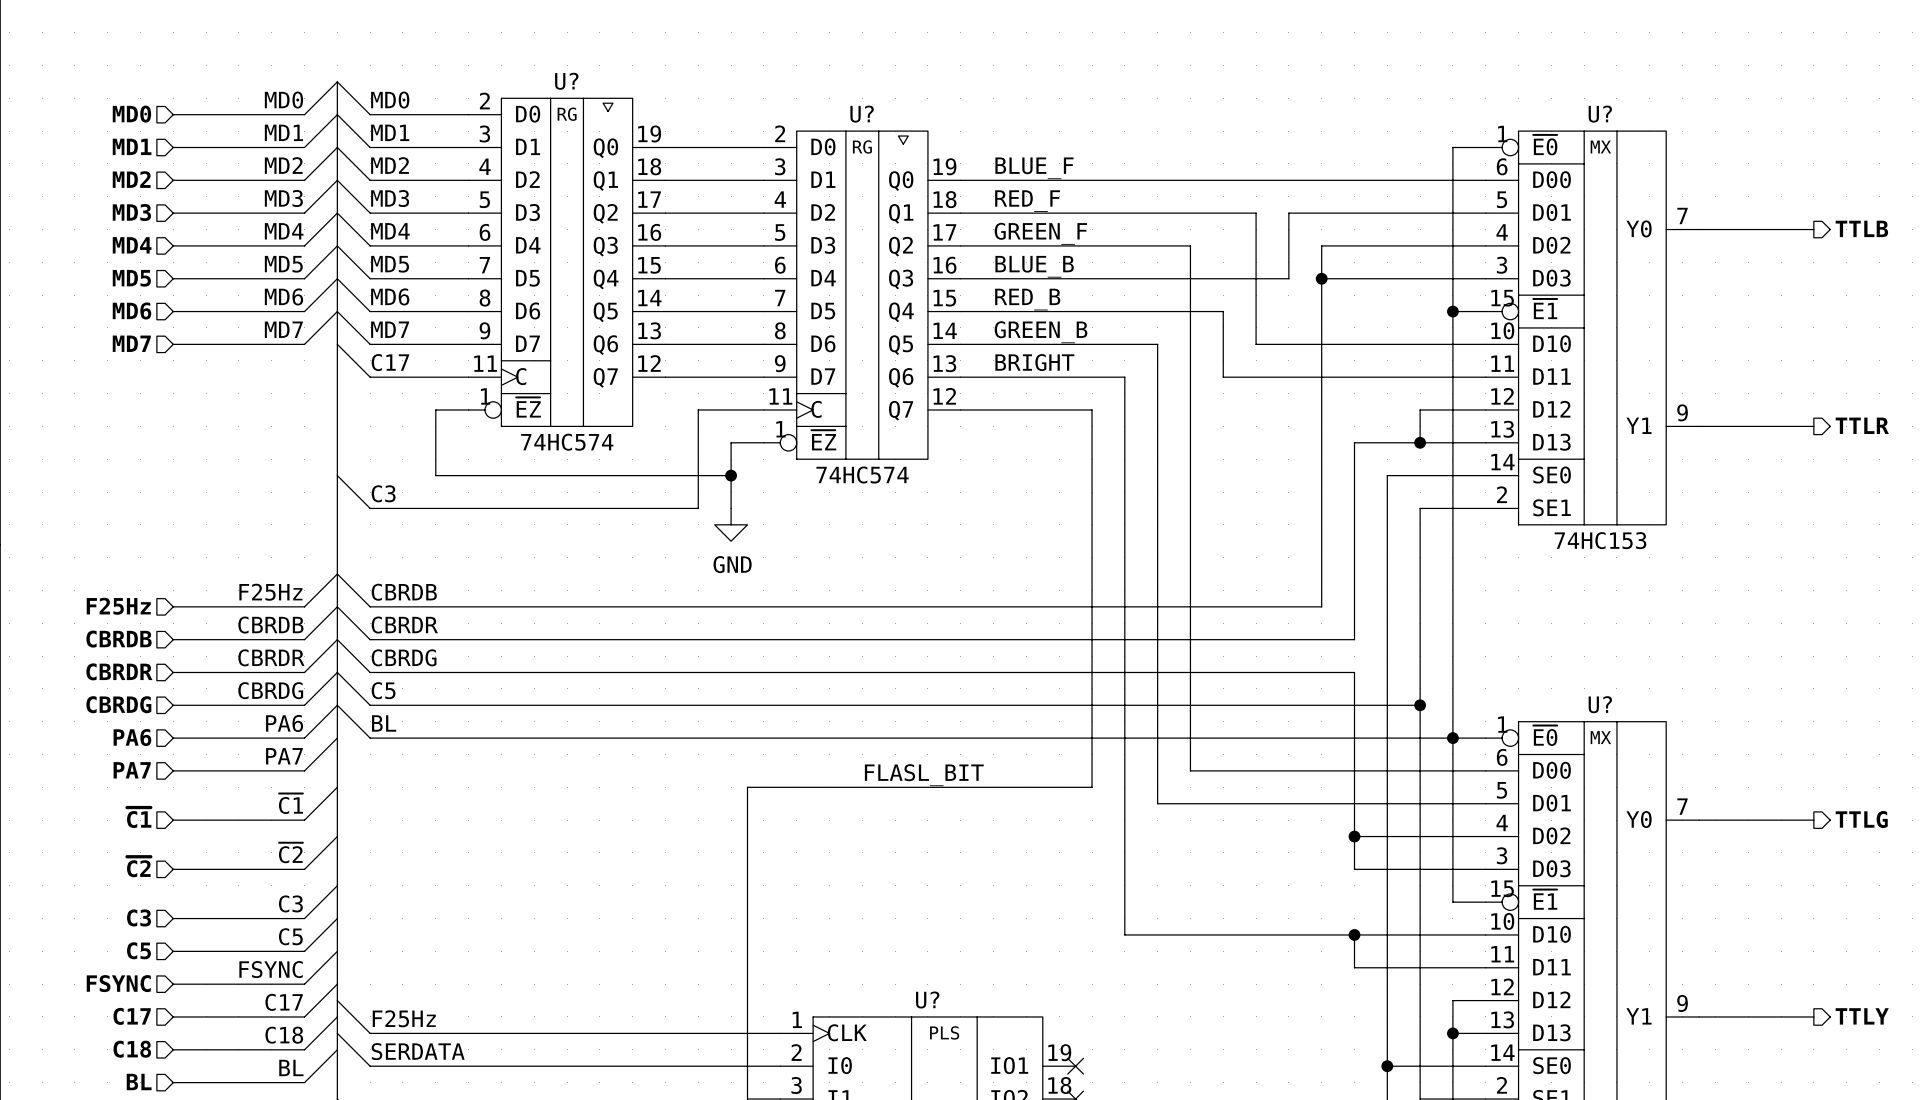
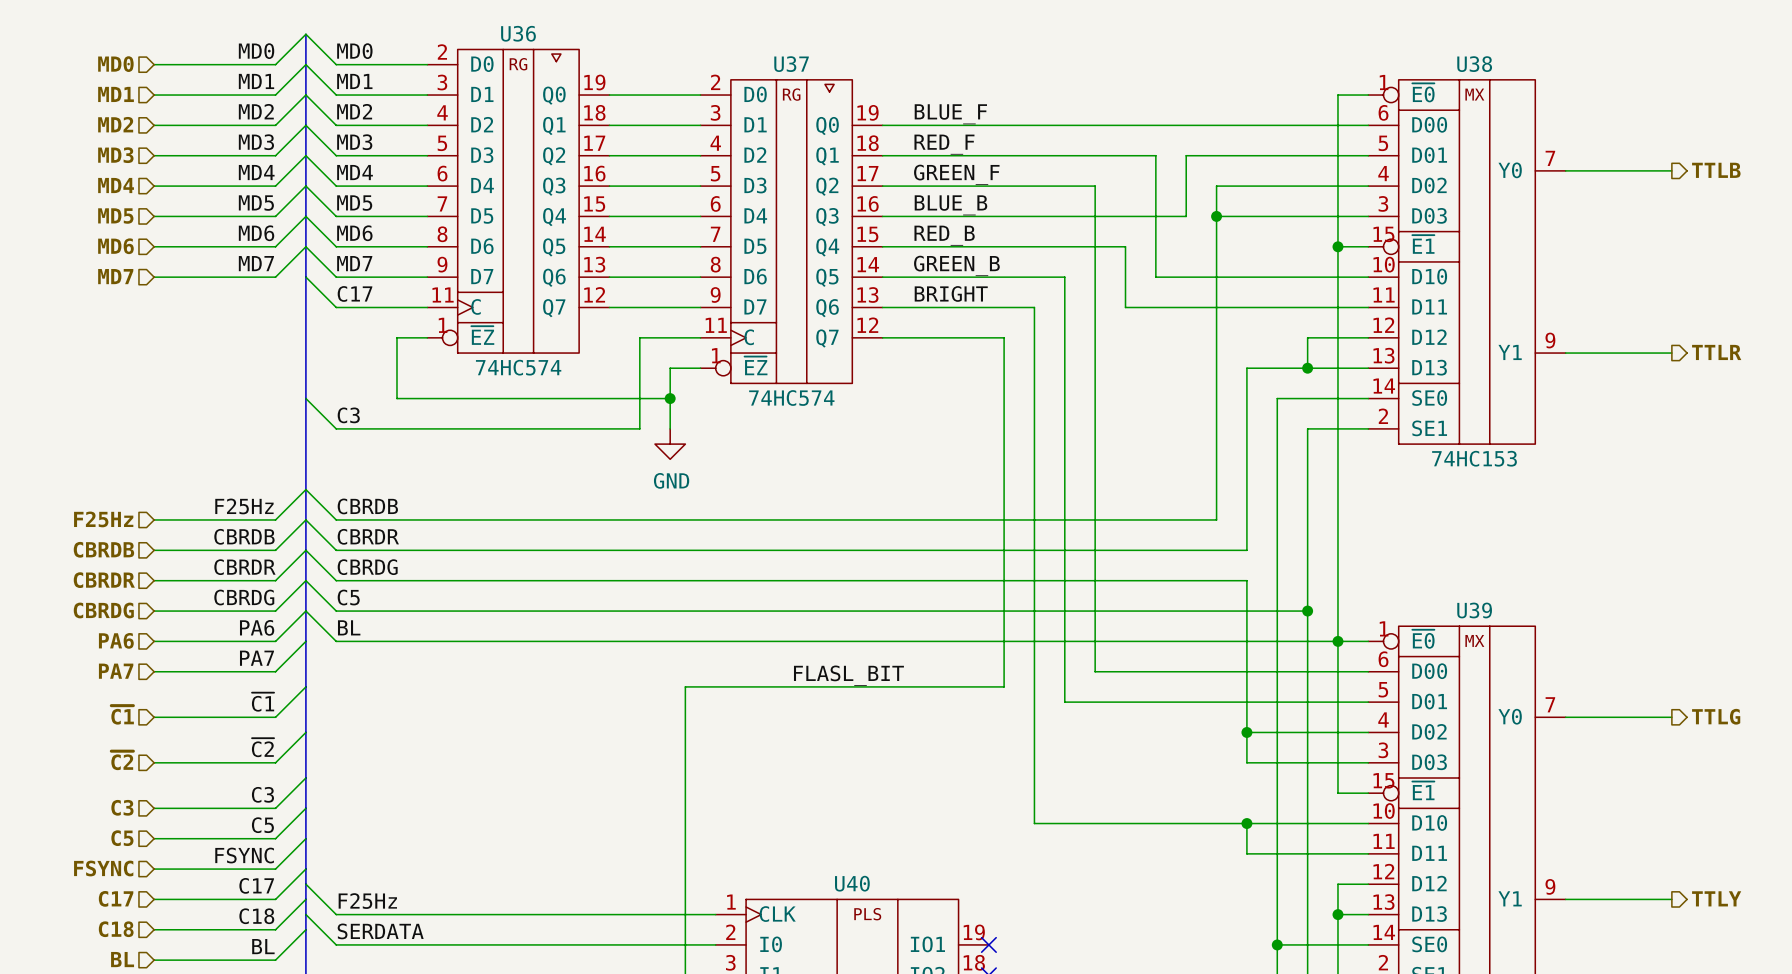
U? name: U? (566, 81) -> U36 (518, 33)
U? name: U? (862, 114) -> U37 (791, 64)
U? name: U? (1600, 114) -> U38 (1474, 64)
U? name: U? (1600, 704) -> U39 (1474, 610)
U? name: U? (927, 999) -> U40 (852, 883)

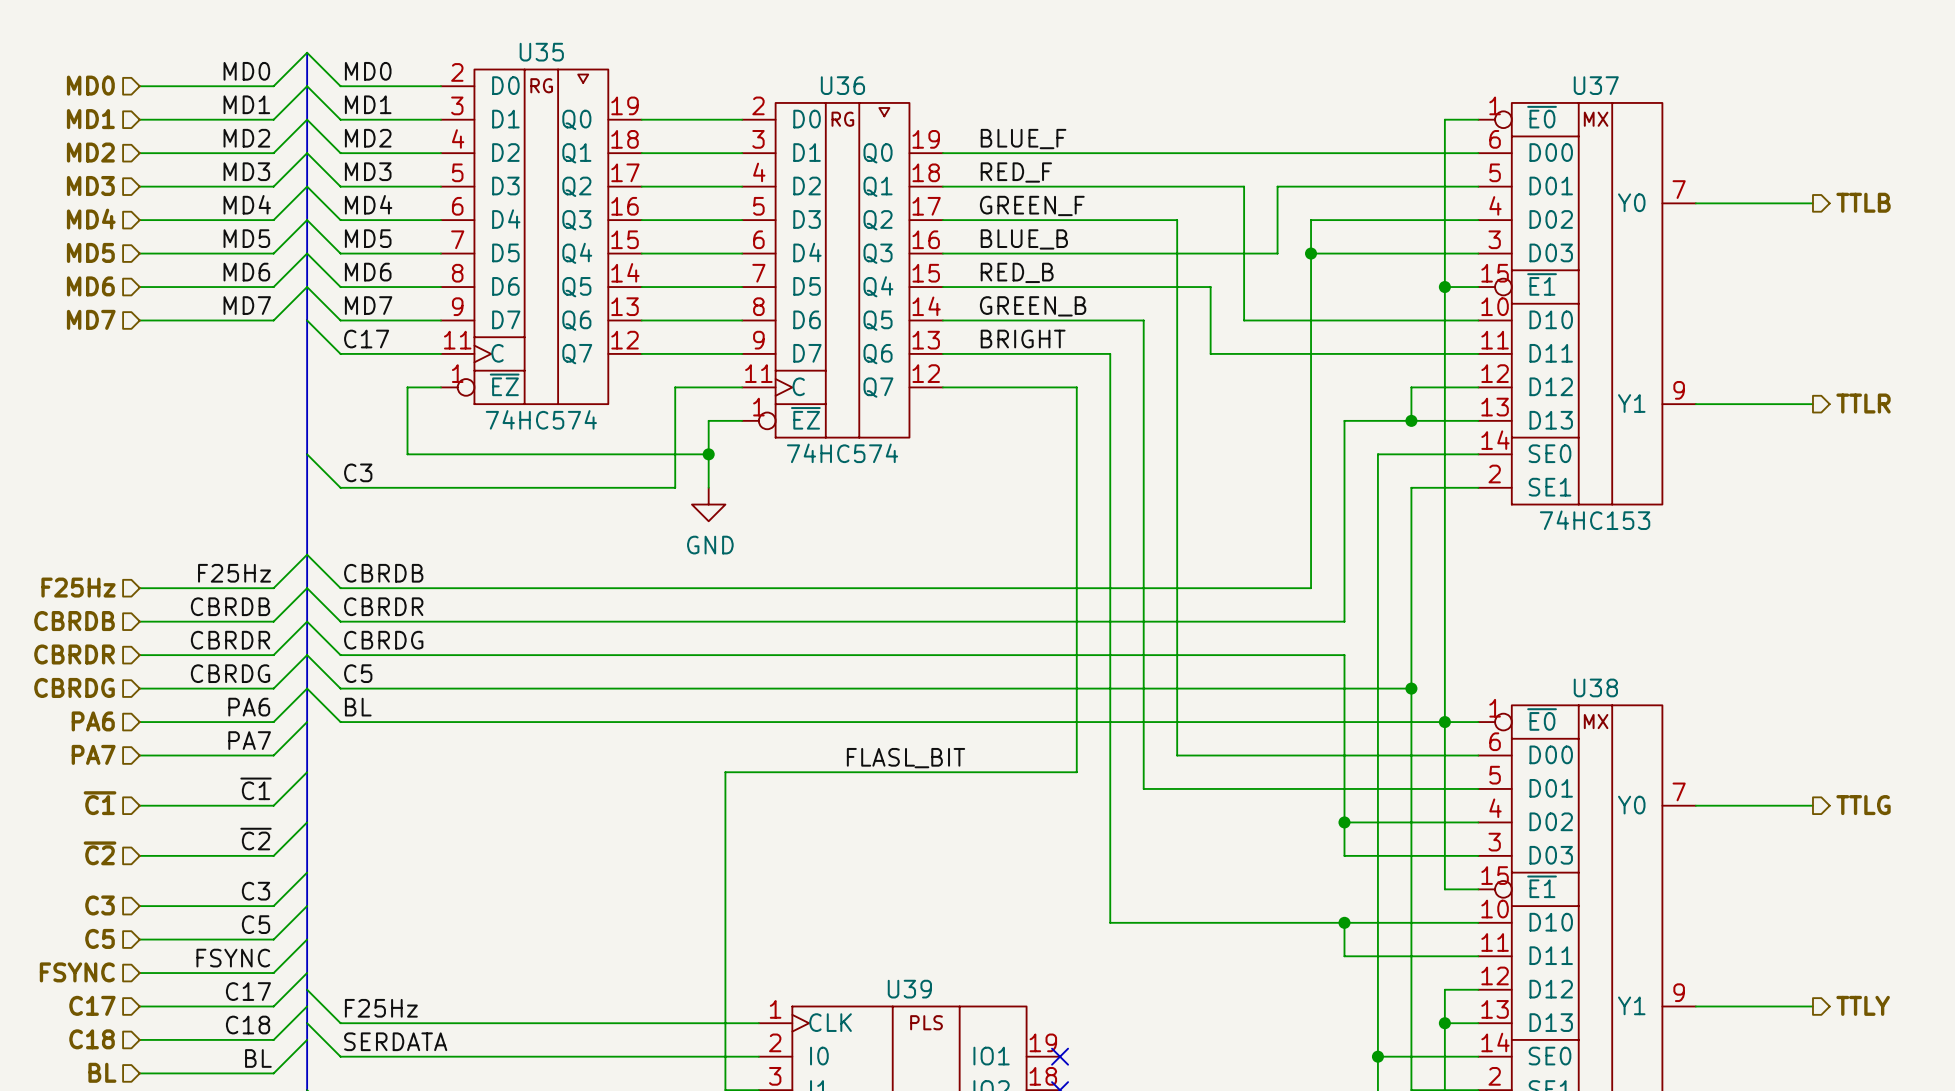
U36 name: U36 (518, 33) -> U35 (541, 52)
U37 name: U37 (791, 64) -> U36 (842, 85)
U38 name: U38 (1474, 64) -> U37 (1596, 85)
U39 name: U39 (1474, 610) -> U38 (1595, 687)
U40 name: U40 (852, 883) -> U39 (909, 989)

